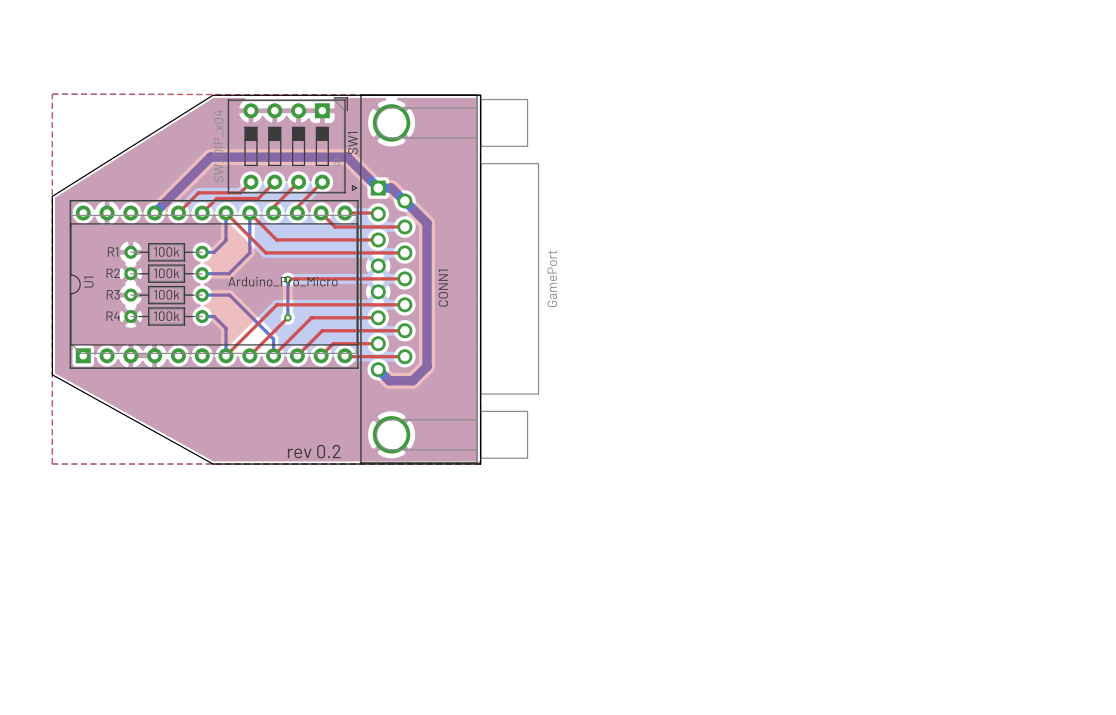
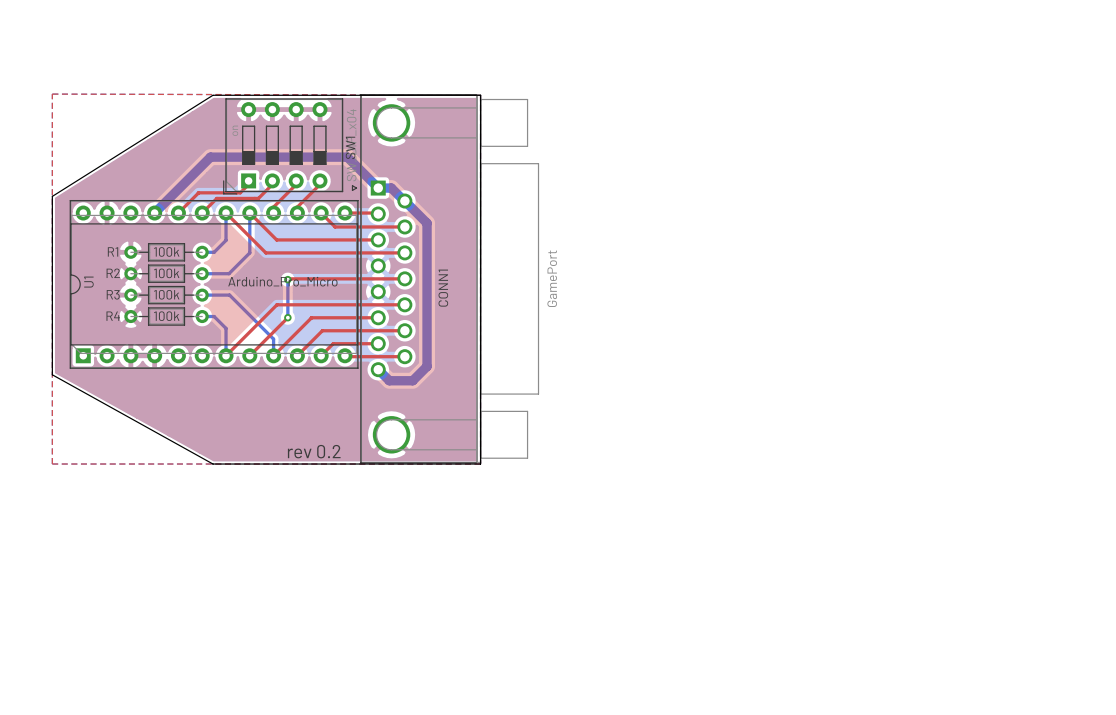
SW1 rotation: 0° (287, 145) -> 180° (283, 146)

